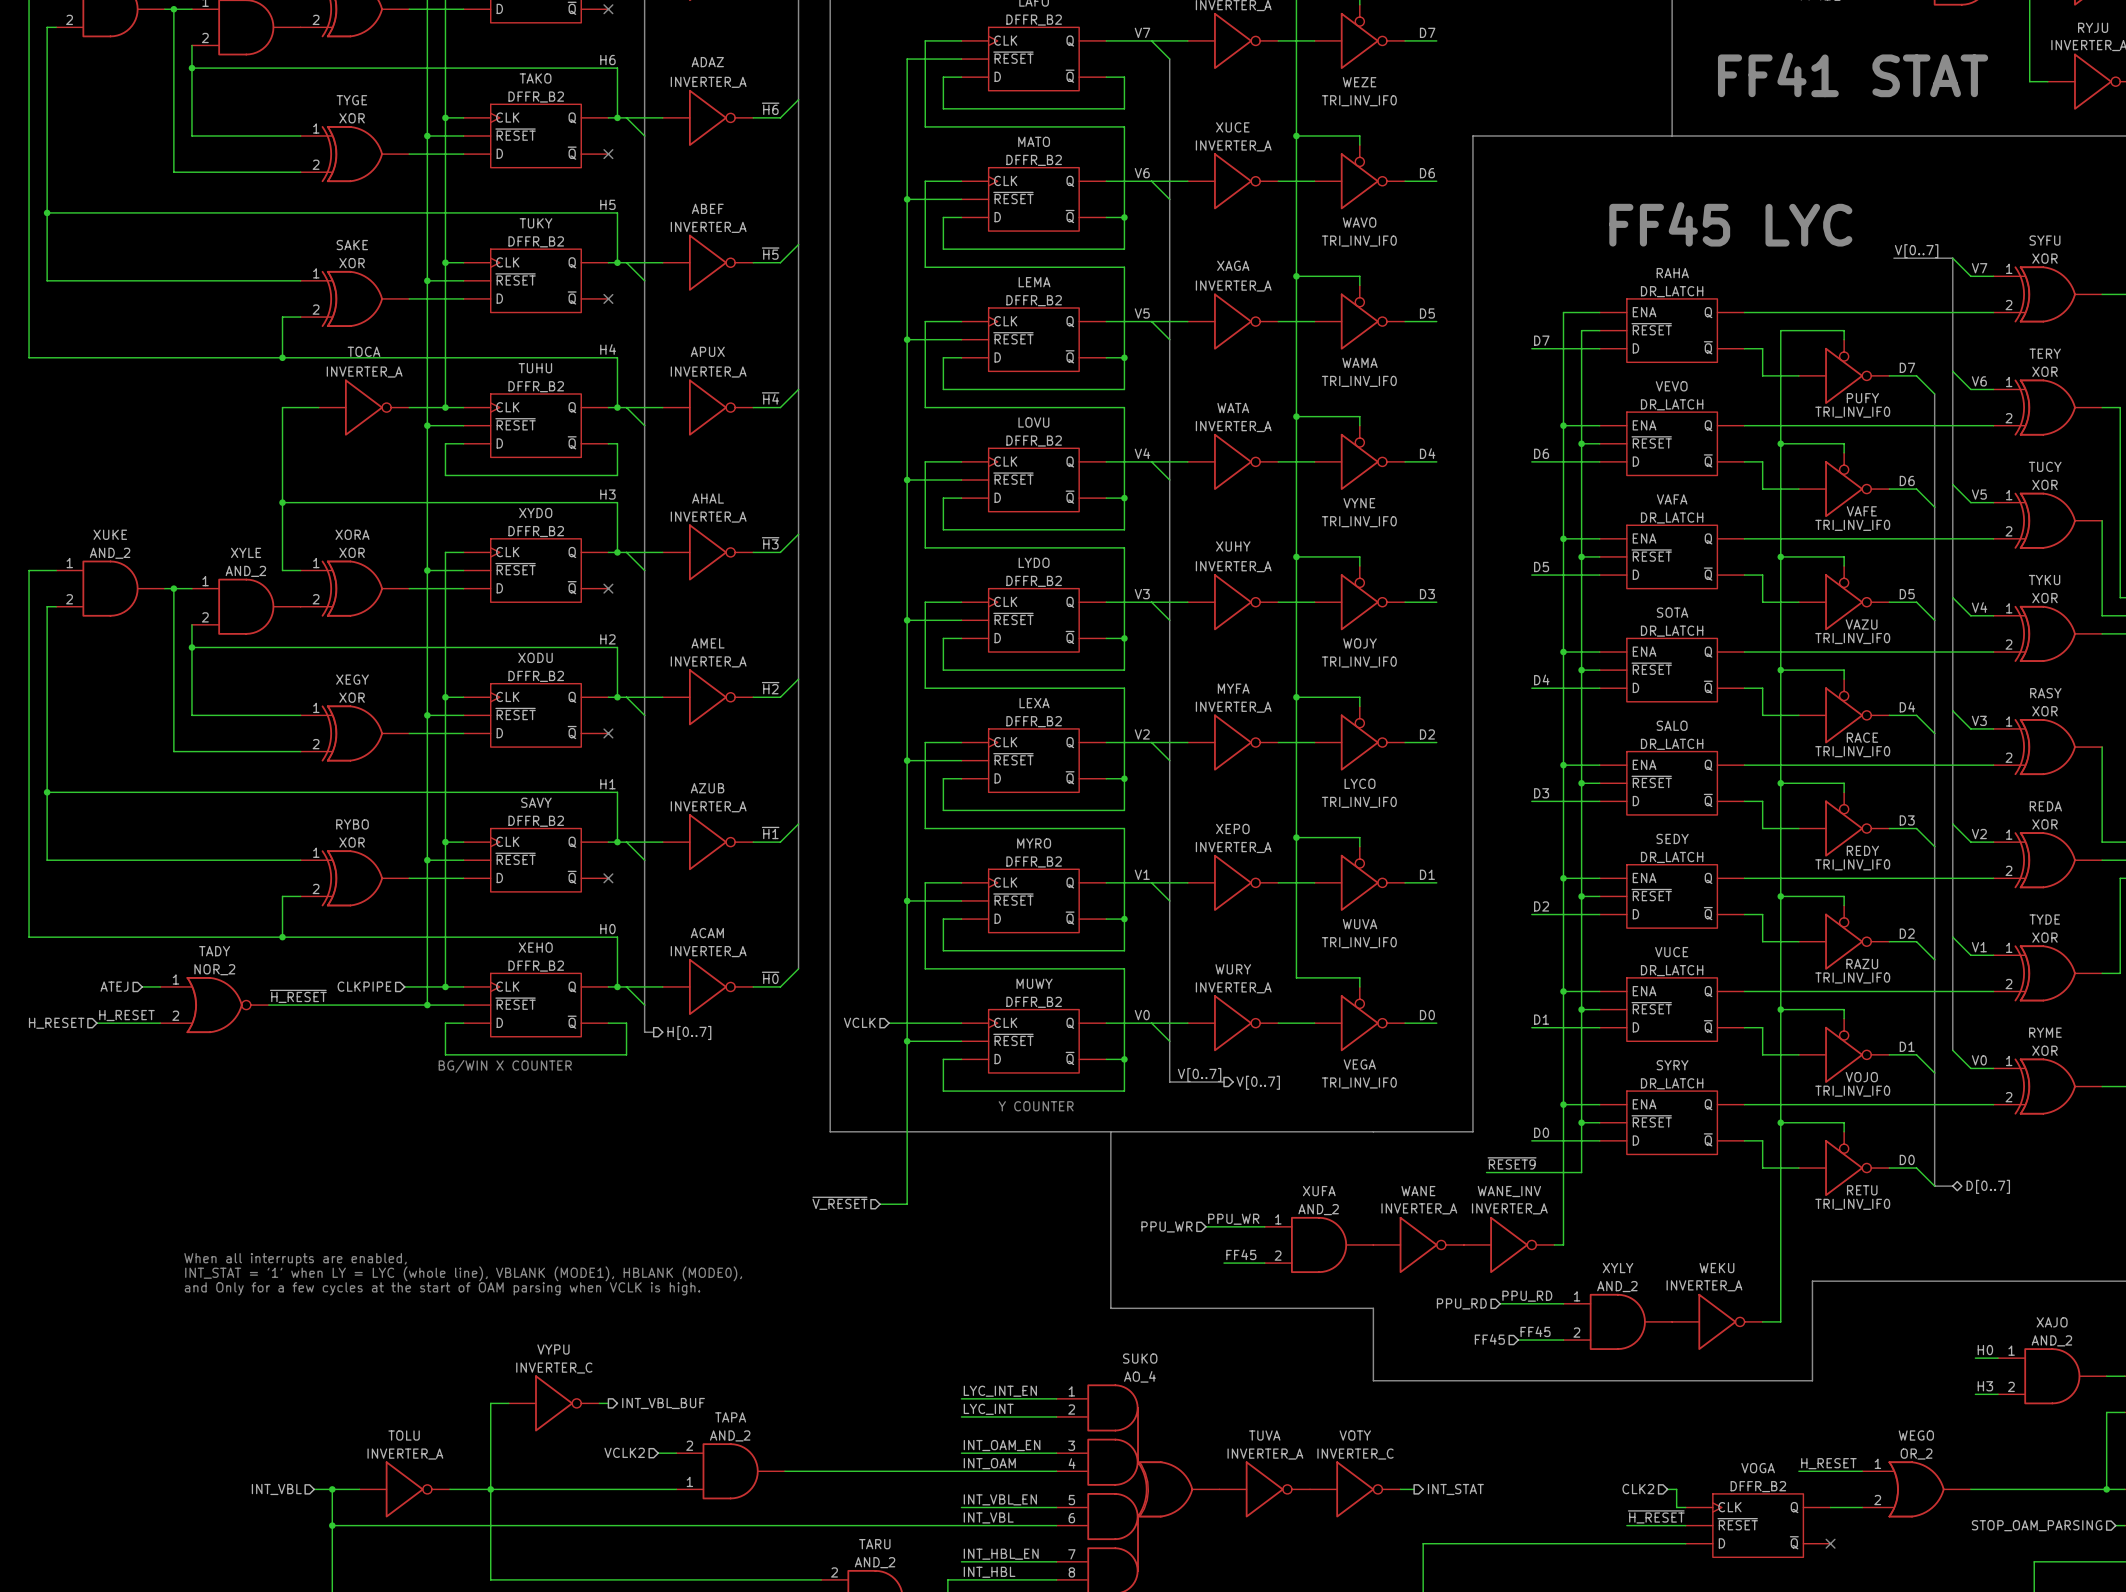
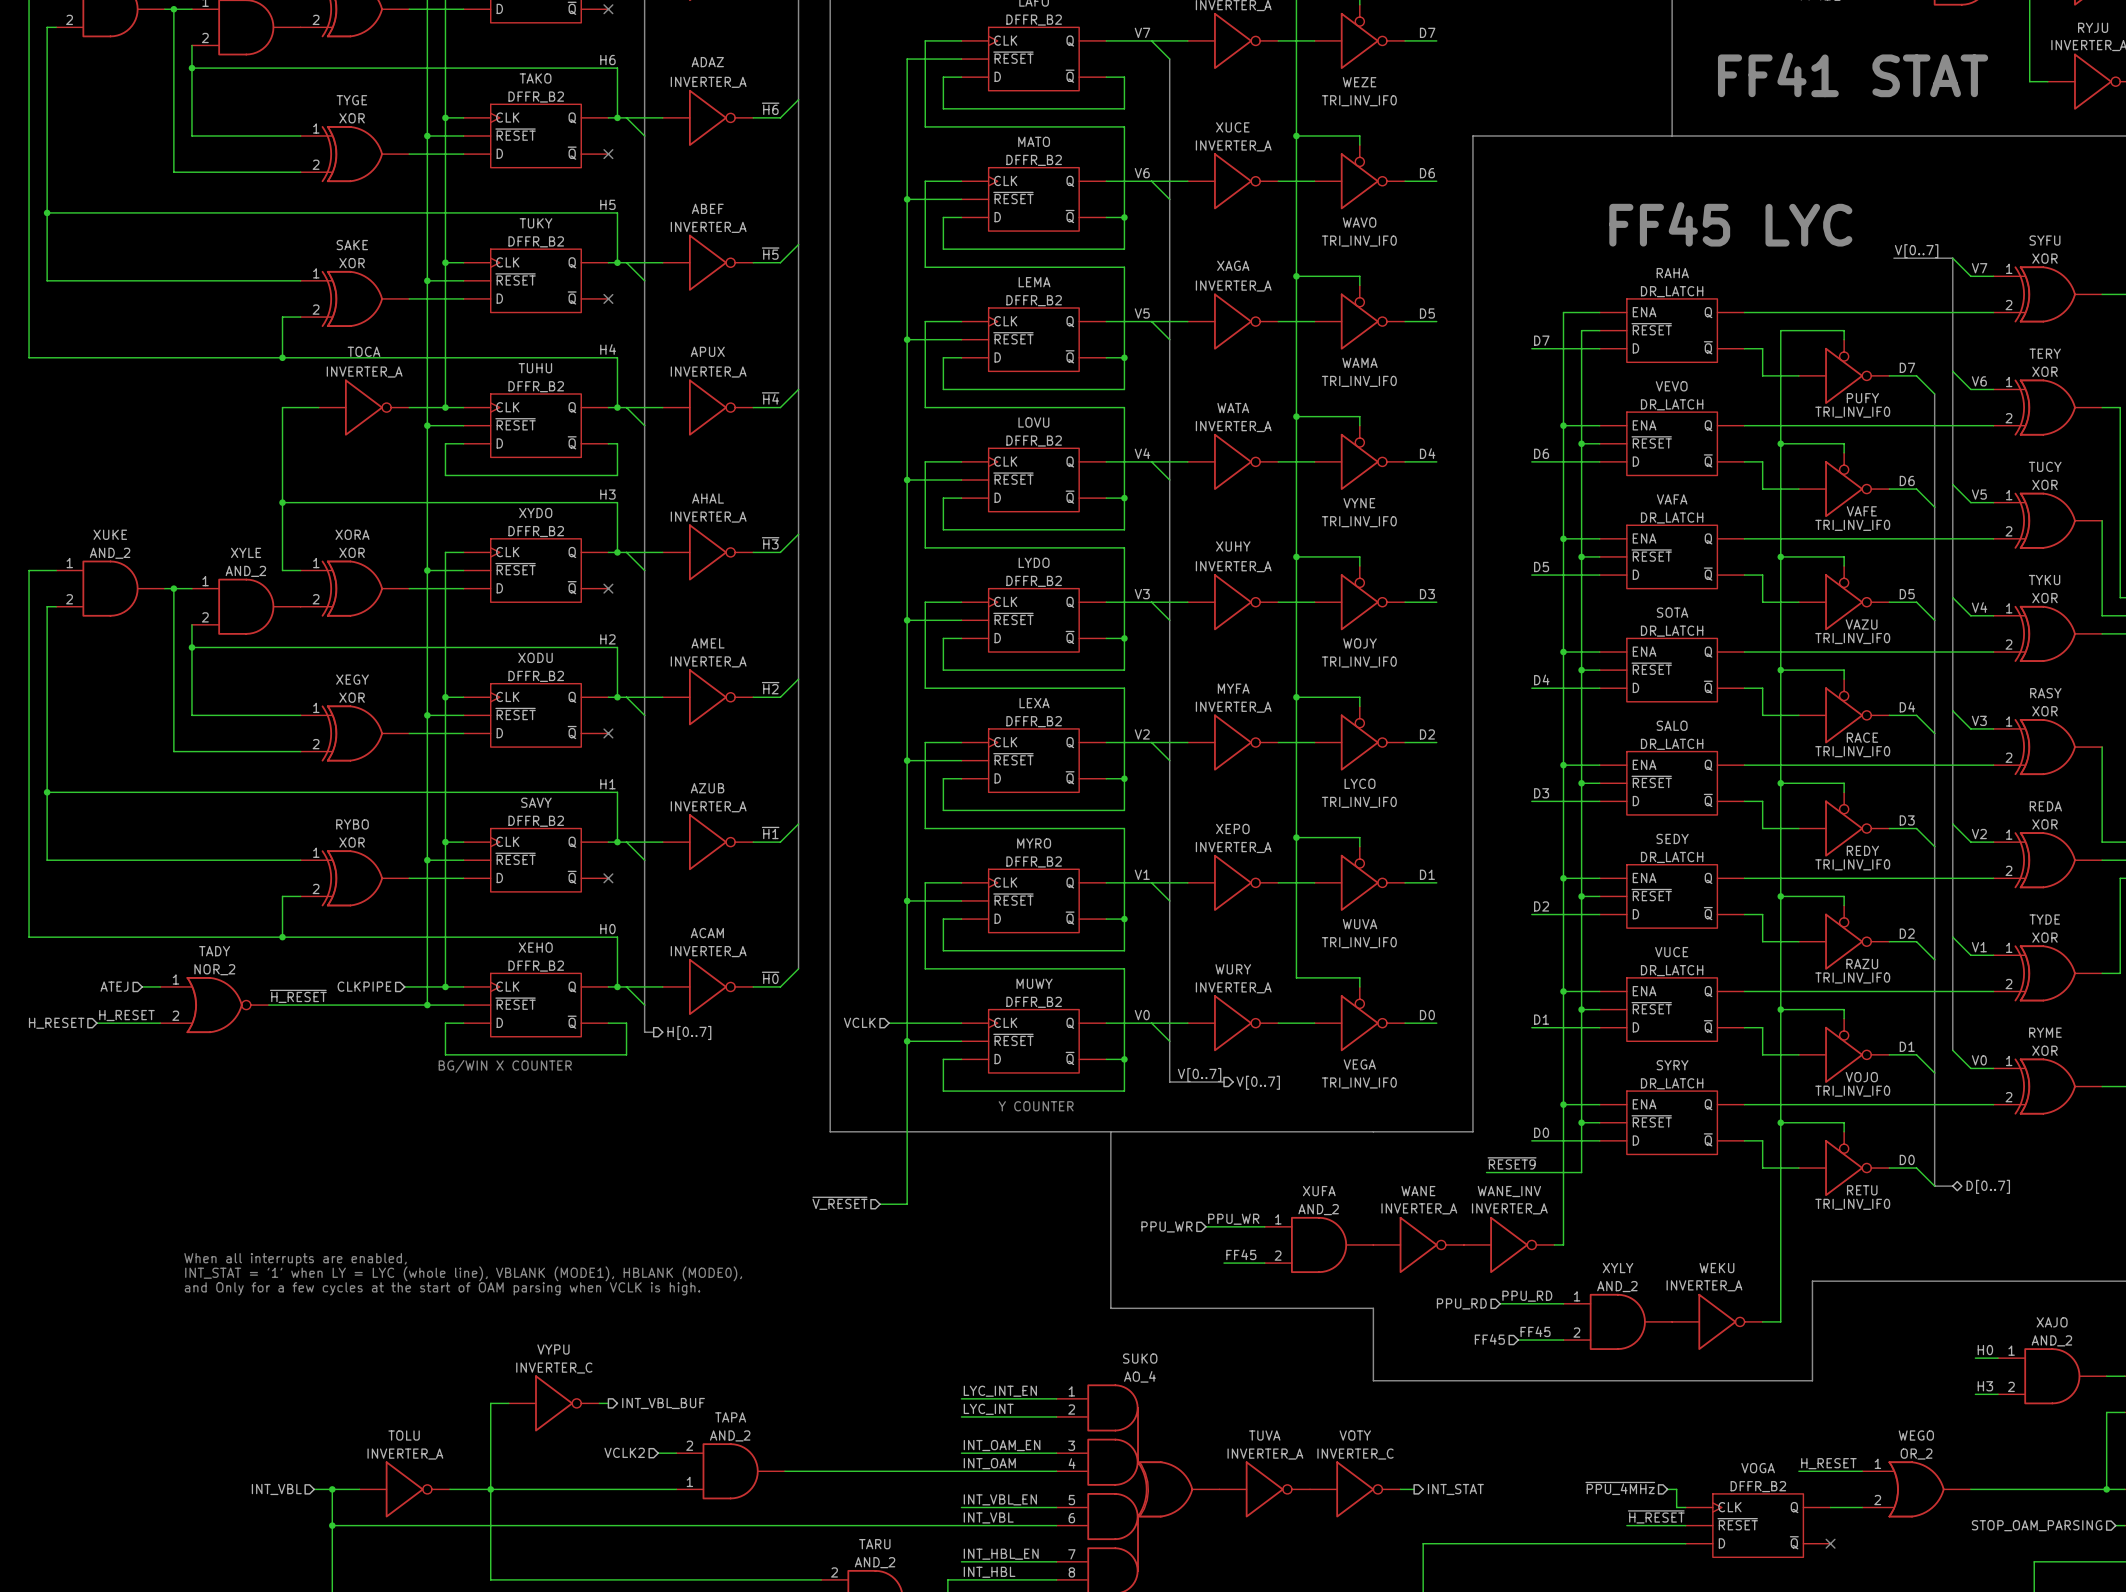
hierarchical label: CLK2 (1638, 1489) -> ~{PPU_4MHz} (1620, 1488)

